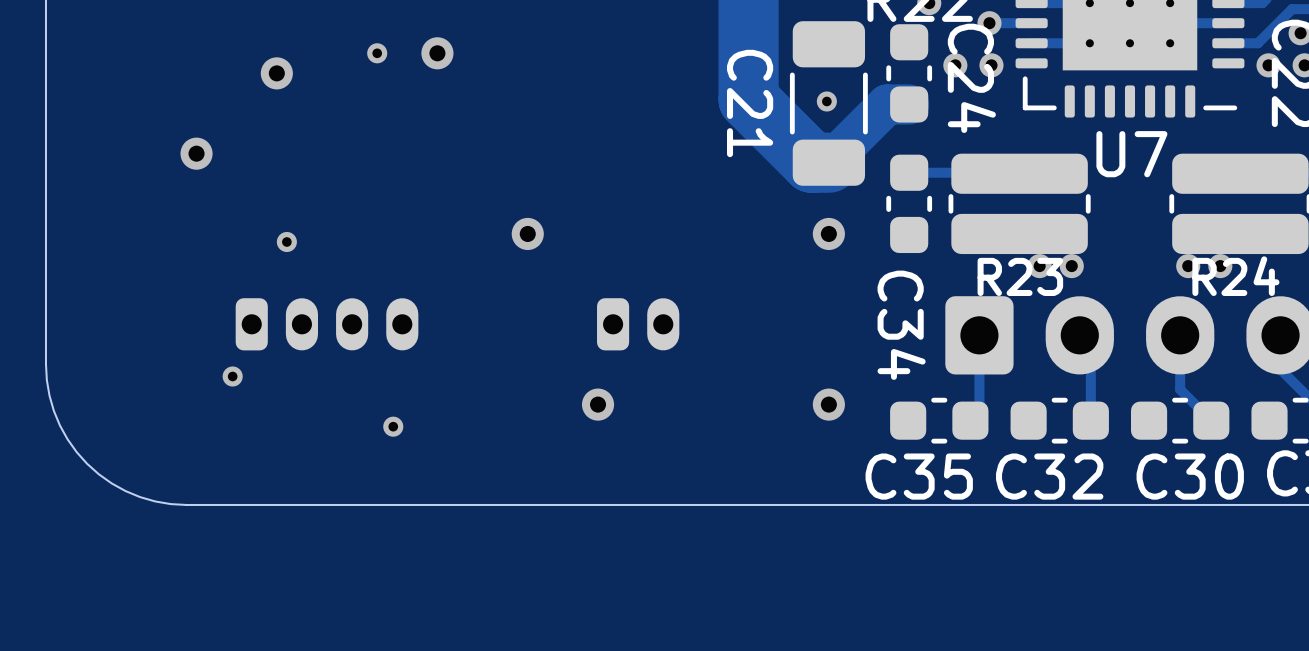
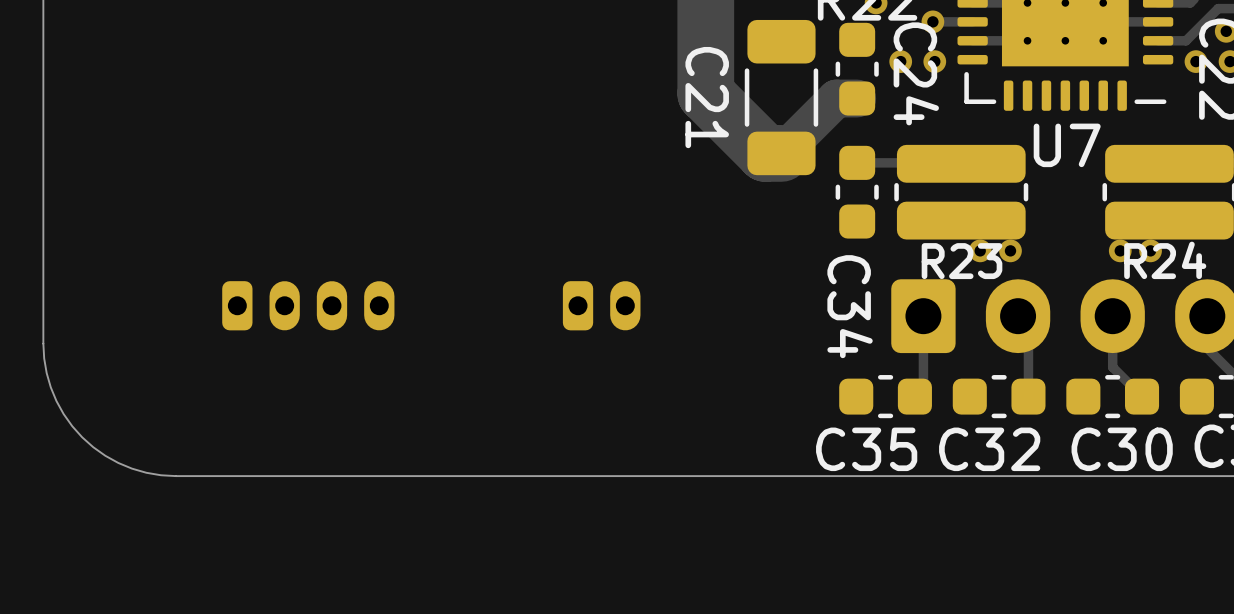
via: (377, 53) -> none
via: (437, 53) -> none
via: (276, 73) -> none
via: (826, 101) -> none
via: (196, 153) -> none
via: (527, 233) -> none
via: (828, 233) -> none
via: (286, 242) -> none
via: (232, 376) -> none
via: (598, 404) -> none
via: (828, 404) -> none
via: (393, 426) -> none

